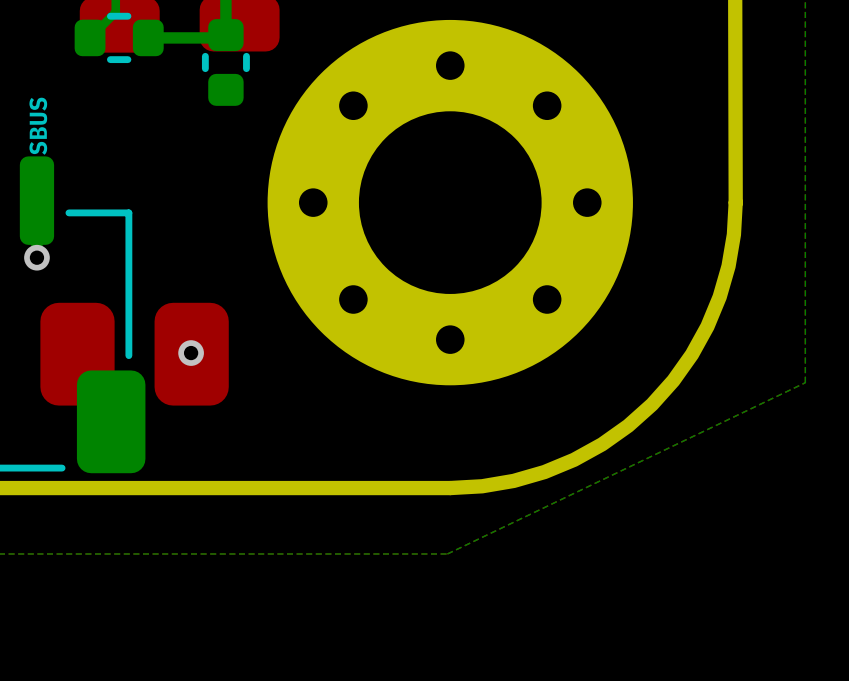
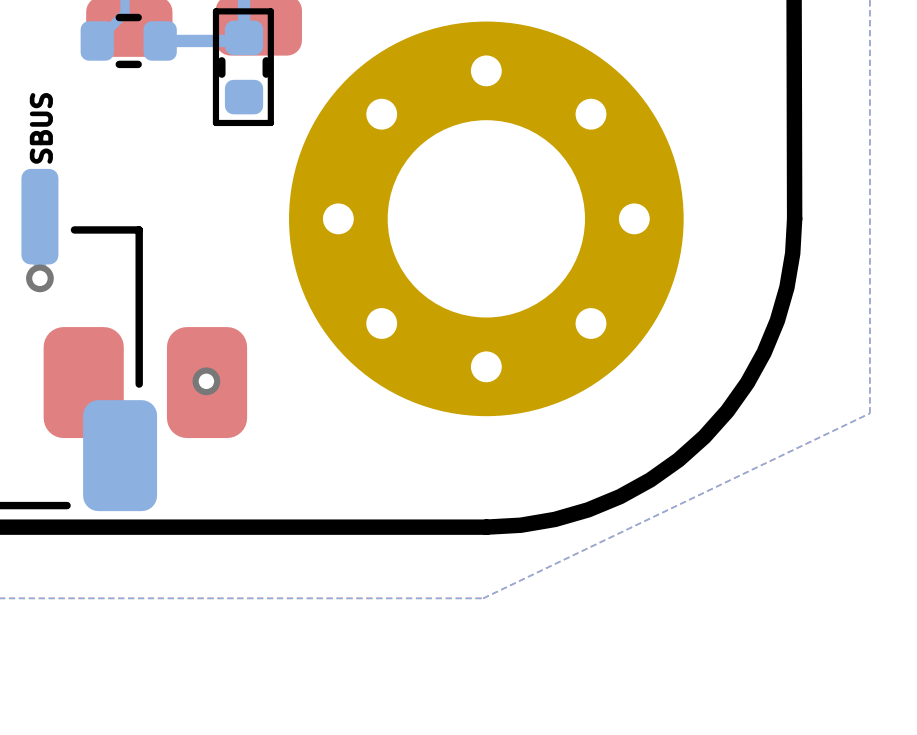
line: none -> (270, 11) (215, 11) (215, 122) (270, 122) (270, 11)

